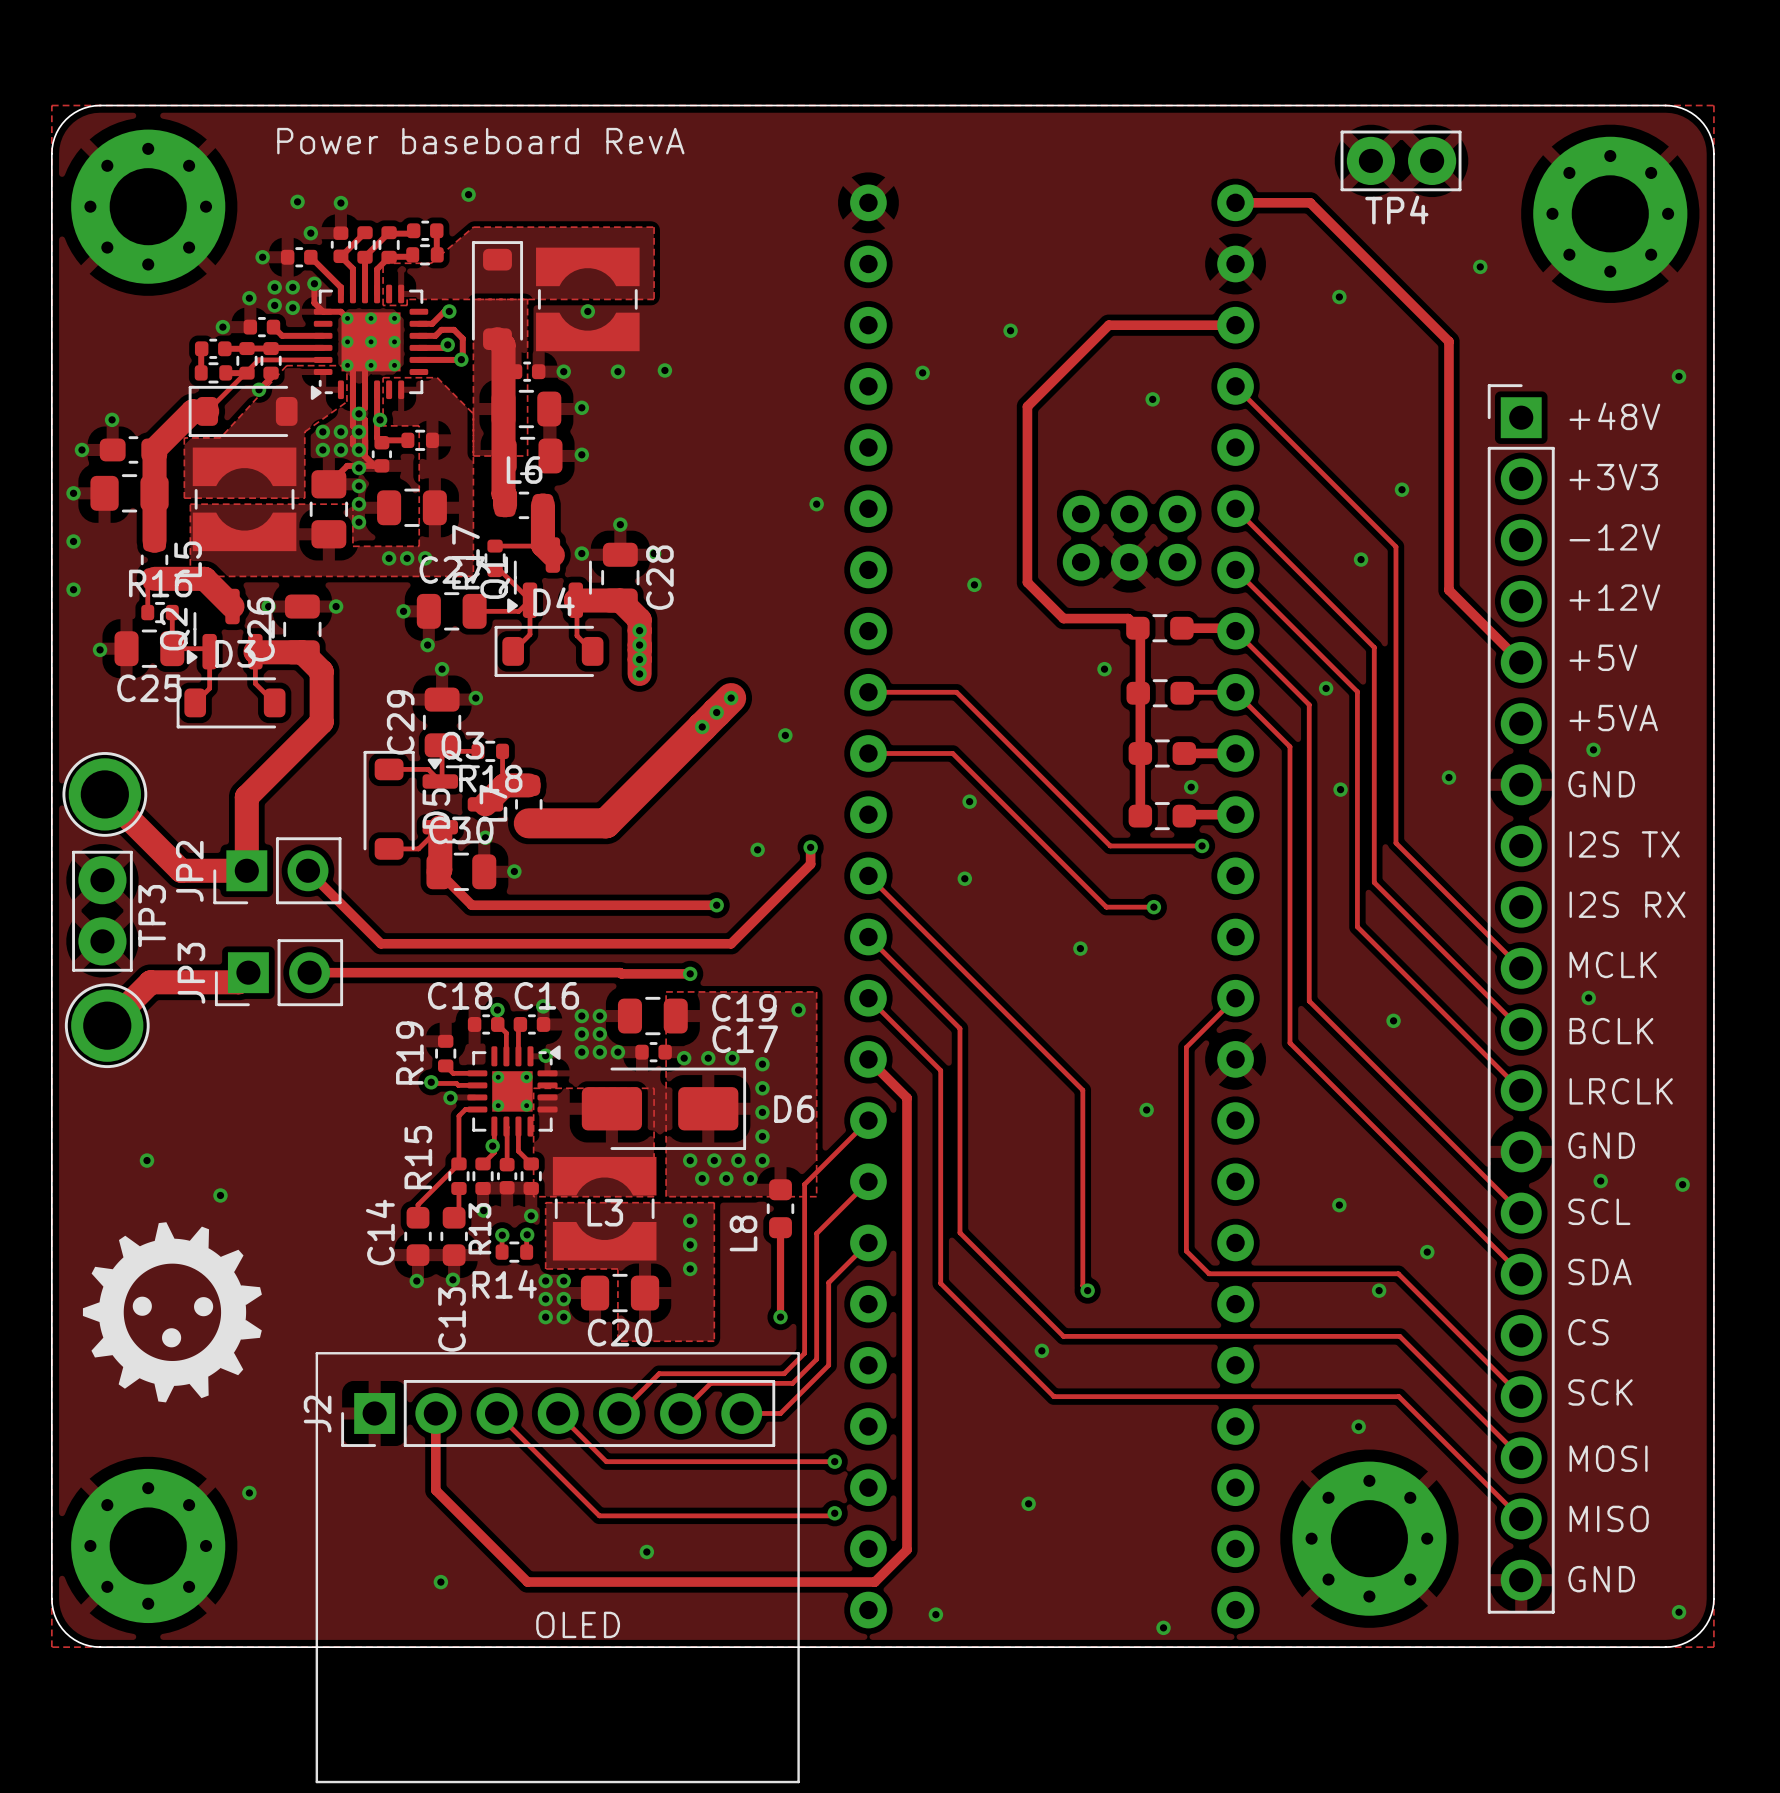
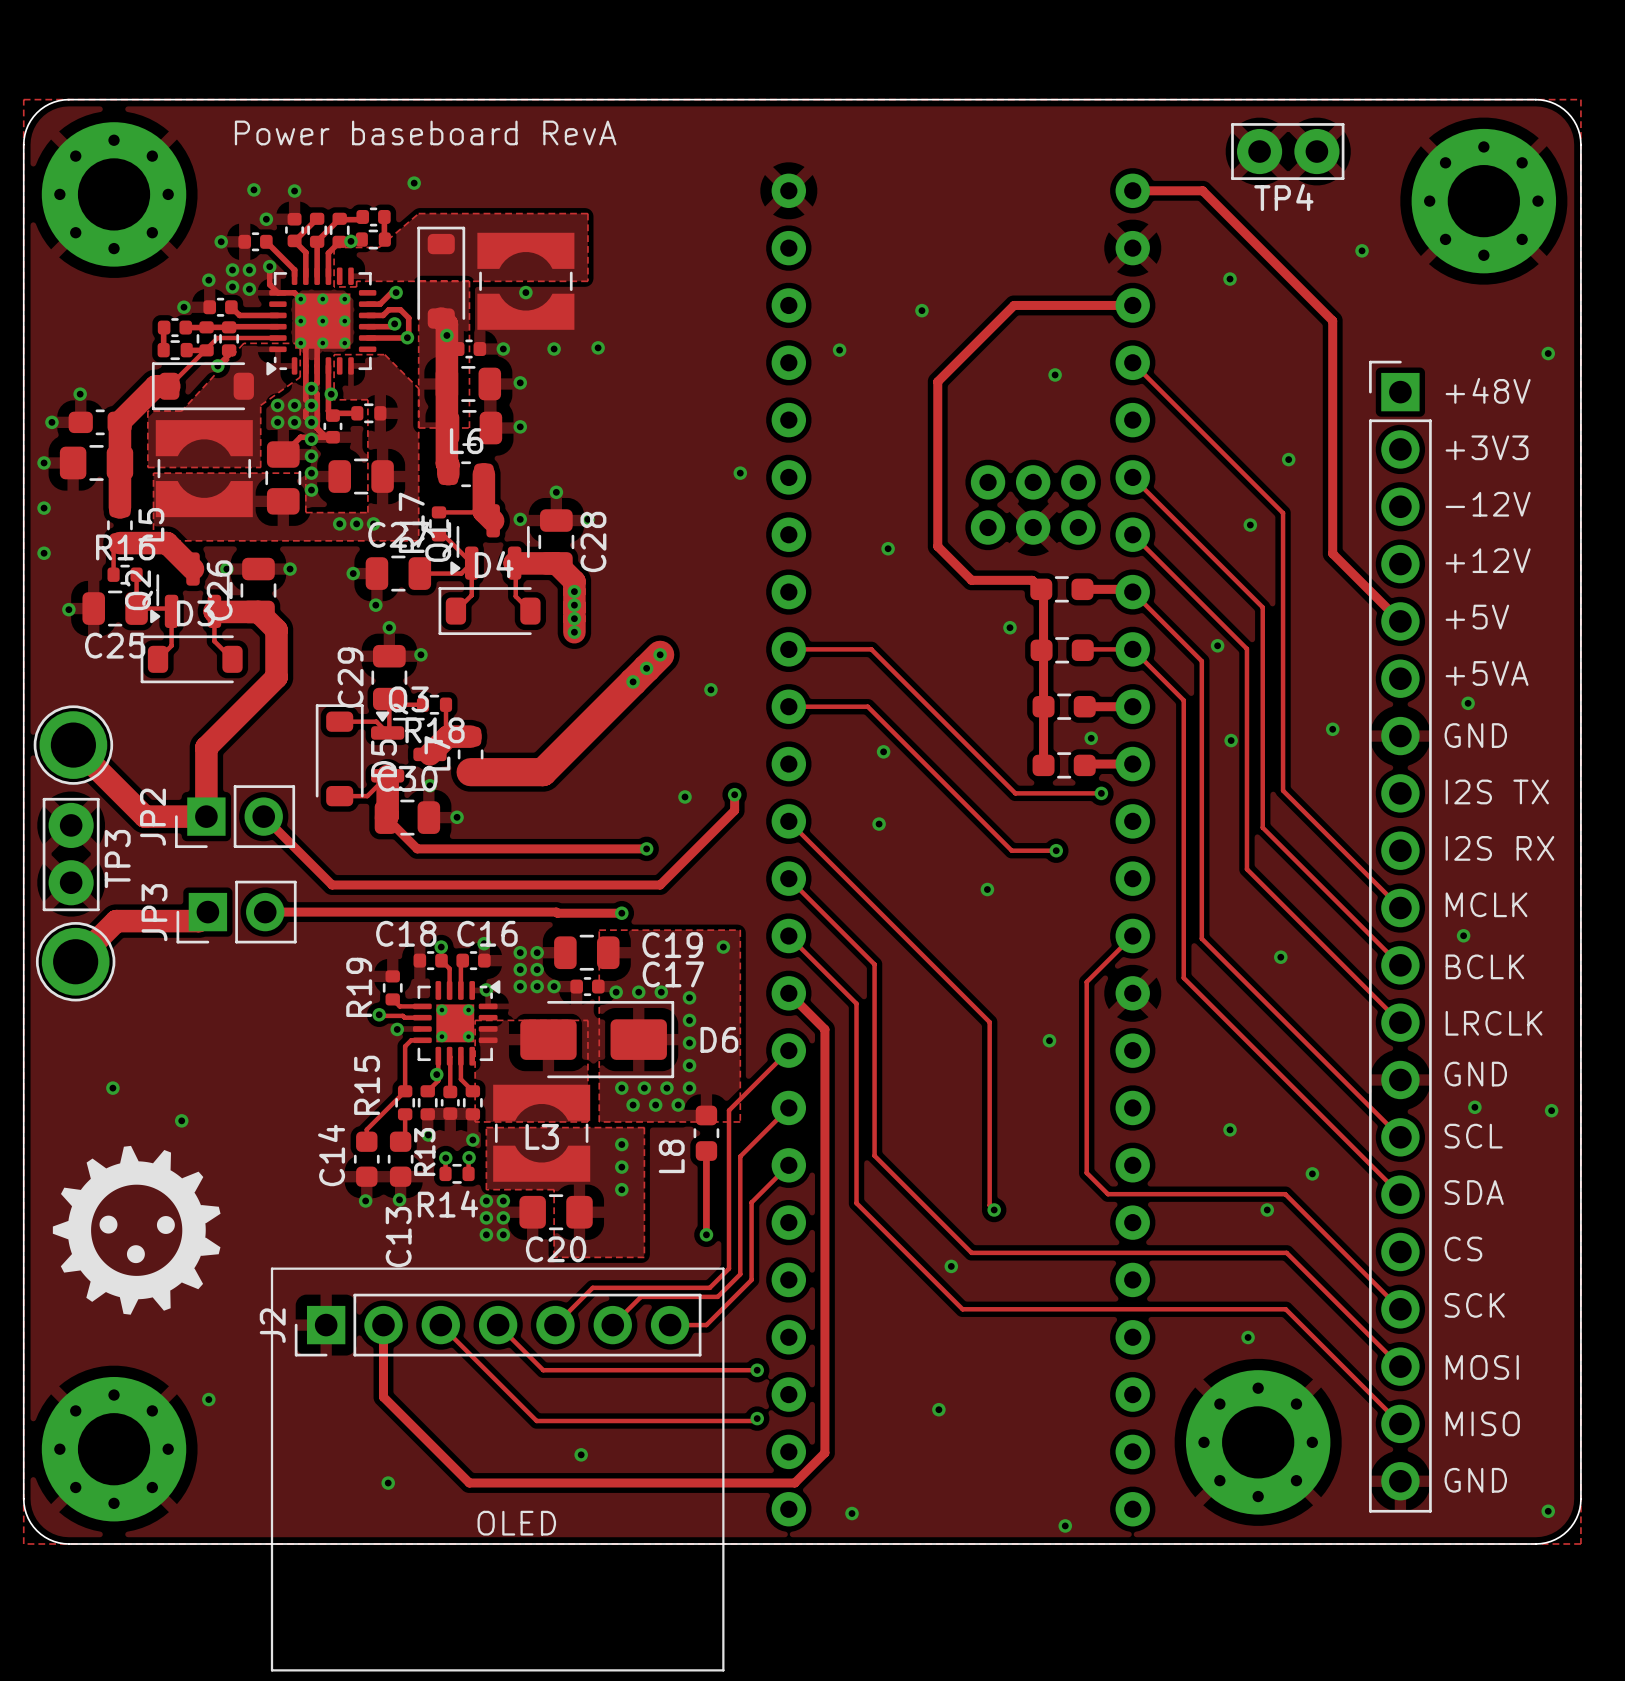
via: none -> (350, 241)
via: none -> (446, 335)

